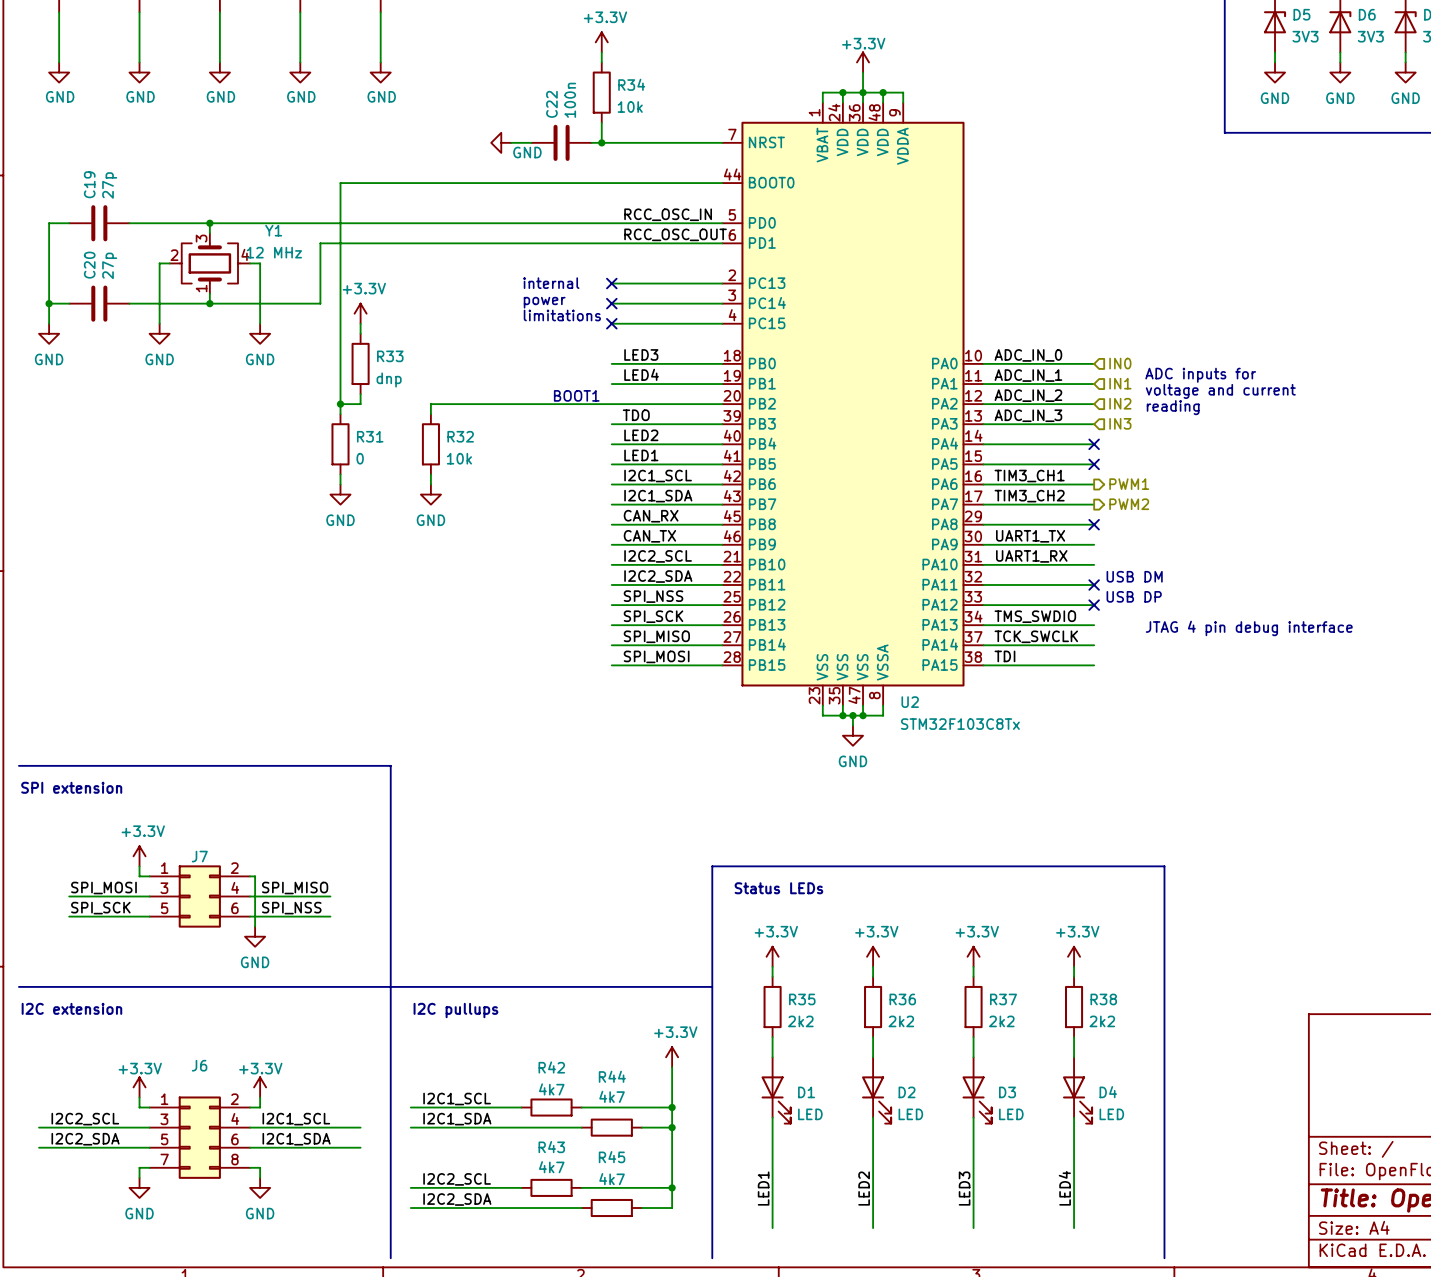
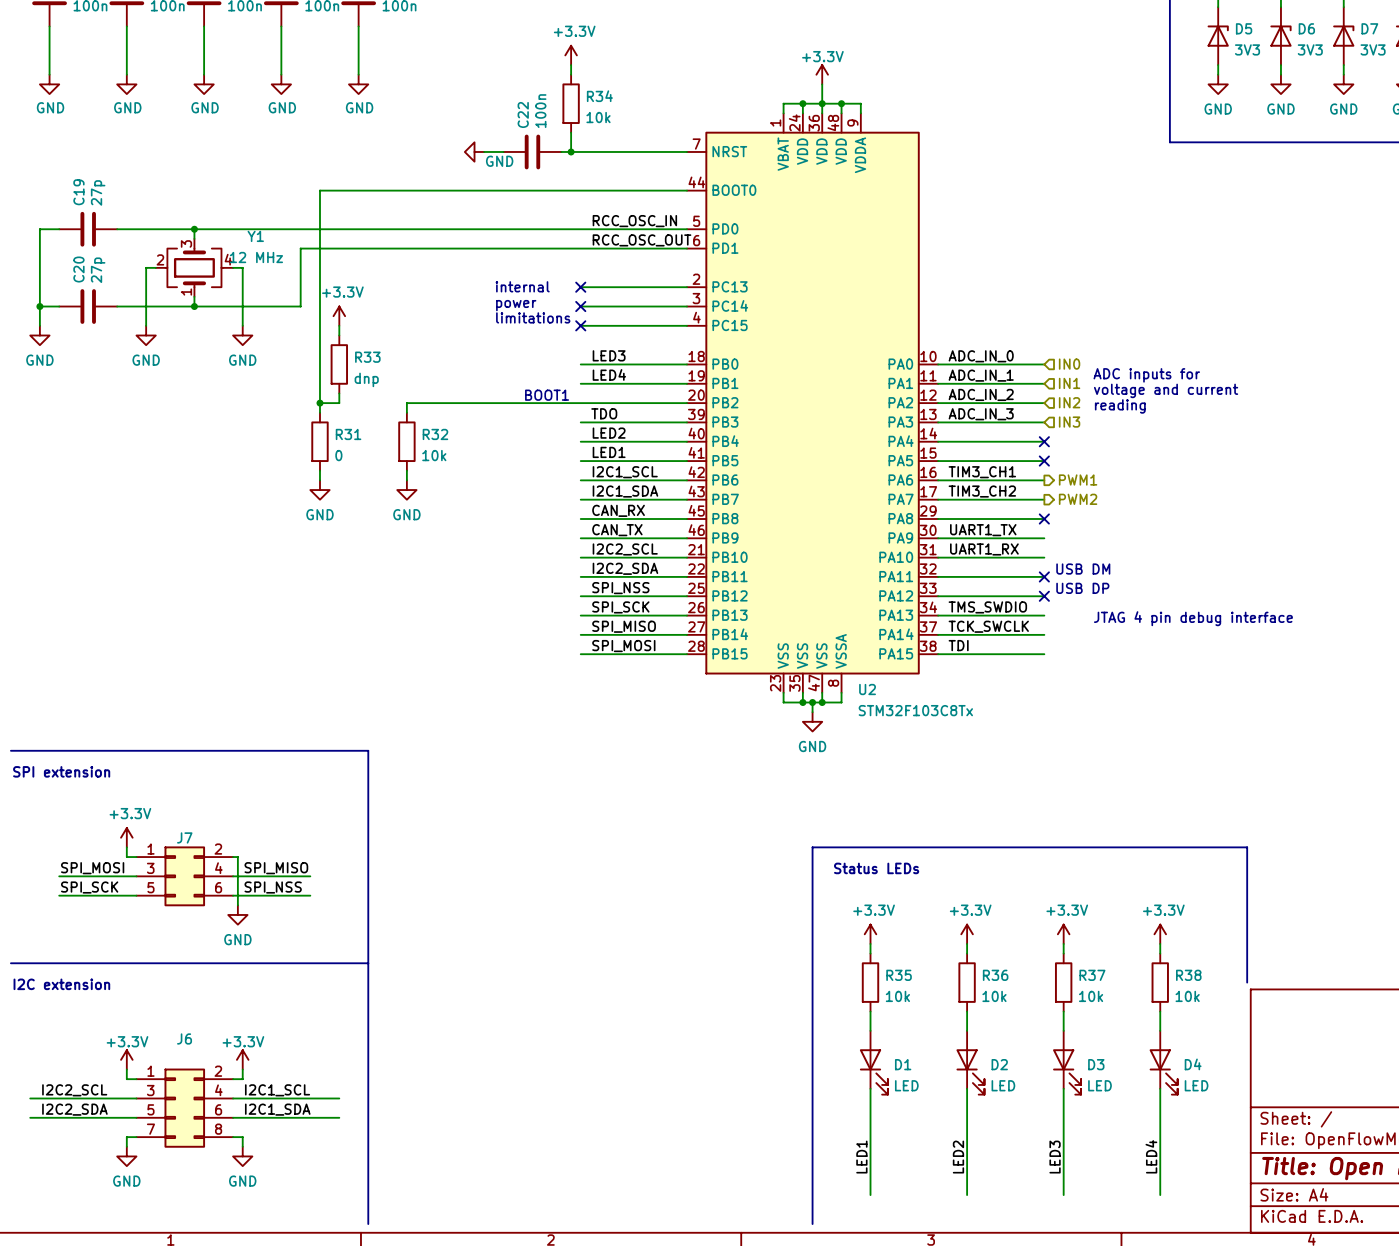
line: (852, 866) (712, 866) (712, 1258) -> (812, 847) (812, 1224)
line: (1164, 866) (1164, 1258) -> (1111, 847) (1247, 847) (1247, 982)
text position: Status LEDs (778, 888) -> Status LEDs (876, 868)
power symbol: +3.3V (772, 956) -> none
power symbol: +3.3V (873, 956) -> none
power symbol: none -> +3.3V (870, 934)
power symbol: +3.3V (973, 956) -> none
power symbol: none -> +3.3V (967, 934)
power symbol: +3.3V (1074, 956) -> none
power symbol: none -> +3.3V (1063, 934)
power symbol: none -> +3.3V (1160, 934)
wire: (772, 966) (772, 976) -> (870, 943) (870, 953)
wire: (873, 966) (873, 976) -> (967, 943) (967, 953)
wire: (973, 966) (973, 976) -> (1063, 943) (1063, 953)
wire: (1074, 966) (1074, 976) -> (1160, 943) (1160, 953)
line: (390, 986) (712, 986) -> none
R35 position: (772, 1007) -> (870, 982)
R36 position: (873, 1007) -> (967, 982)
R37 position: (973, 1007) -> (1063, 982)
R38 position: (1074, 1007) -> (1160, 982)
text: I2C pullups (455, 1010) -> none
R35 value: 2k2 (800, 1021) -> 10k (897, 996)
R36 value: 2k2 (901, 1021) -> 10k (994, 996)
R37 value: 2k2 (1001, 1021) -> 10k (1091, 996)
R38 value: 2k2 (1102, 1021) -> 10k (1187, 996)
wire: (772, 1037) (772, 1057) -> (870, 1011) (870, 1030)
wire: (873, 1037) (873, 1057) -> (967, 1011) (967, 1030)
wire: (973, 1037) (973, 1057) -> (1063, 1011) (1063, 1030)
wire: (1074, 1037) (1074, 1057) -> (1160, 1011) (1160, 1030)
power symbol: +3.3V (672, 1057) -> none
wire: (672, 1067) (672, 1208) (641, 1208) -> none
D1 position: (776, 1090) -> (873, 1062)
D2 position: (876, 1090) -> (970, 1062)
D3 position: (977, 1090) -> (1067, 1062)
D4 position: (1077, 1090) -> (1163, 1062)
label: I2C1_SCL (457, 1099) -> none
wire: (410, 1107) (521, 1107) -> none
R42: 4k7 (551, 1107) -> none
wire: (581, 1107) (672, 1107) -> none
junction: (672, 1107) -> none
wire: (772, 1117) (772, 1228) -> (870, 1088) (870, 1195)
wire: (873, 1117) (873, 1228) -> (967, 1088) (967, 1195)
wire: (973, 1117) (973, 1228) -> (1063, 1088) (1063, 1195)
wire: (1074, 1117) (1074, 1228) -> (1160, 1088) (1160, 1195)
label: I2C1_SDA (457, 1119) -> none
wire: (410, 1127) (581, 1127) -> none
R44: 4k7 (611, 1127) -> none
wire: (641, 1127) (672, 1127) -> none
junction: (672, 1127) -> none
label: I2C2_SCL (457, 1179) -> none
wire: (410, 1187) (521, 1187) -> none
R43: 4k7 (551, 1187) -> none
wire: (581, 1187) (672, 1187) -> none
junction: (672, 1187) -> none
label position: LED1 (763, 1188) -> LED1 (861, 1157)
label position: LED2 (864, 1188) -> LED2 (958, 1157)
label position: LED3 (964, 1188) -> LED3 (1055, 1157)
label position: LED4 (1064, 1188) -> LED4 (1151, 1156)
label: I2C2_SDA (457, 1199) -> none
wire: (410, 1208) (581, 1208) -> none
R45: 4k7 (611, 1208) -> none

